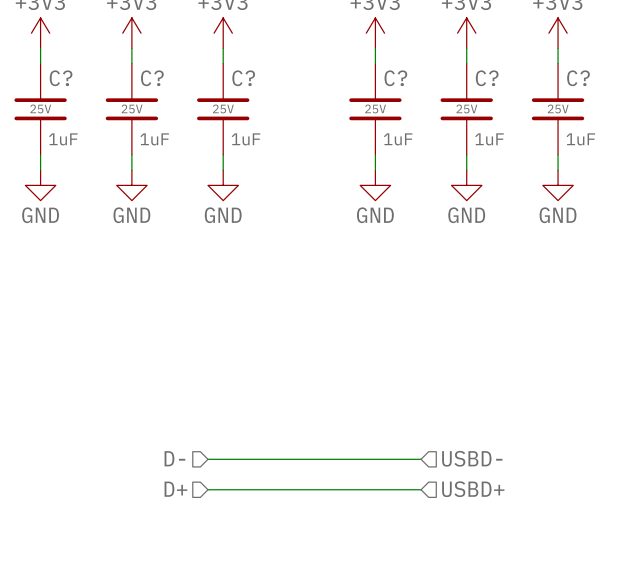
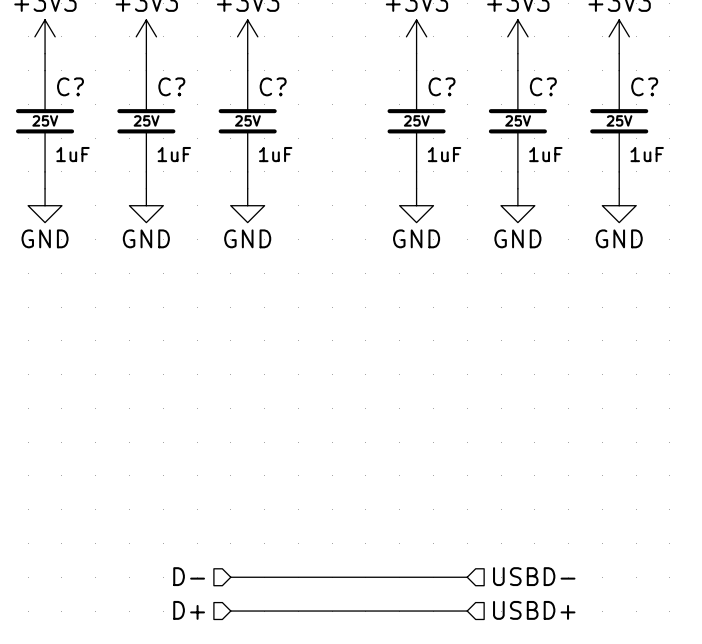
hierarchical label position: D- (174, 458) -> D- (189, 576)
hierarchical label position: USBD- (472, 458) -> USBD- (534, 576)
wire: (207, 459) (421, 459) -> (230, 611) (467, 611)
hierarchical label position: D+ (175, 489) -> D+ (189, 610)
wire: (207, 489) (421, 489) -> (230, 577) (467, 577)
hierarchical label position: USBD+ (473, 489) -> USBD+ (534, 610)

